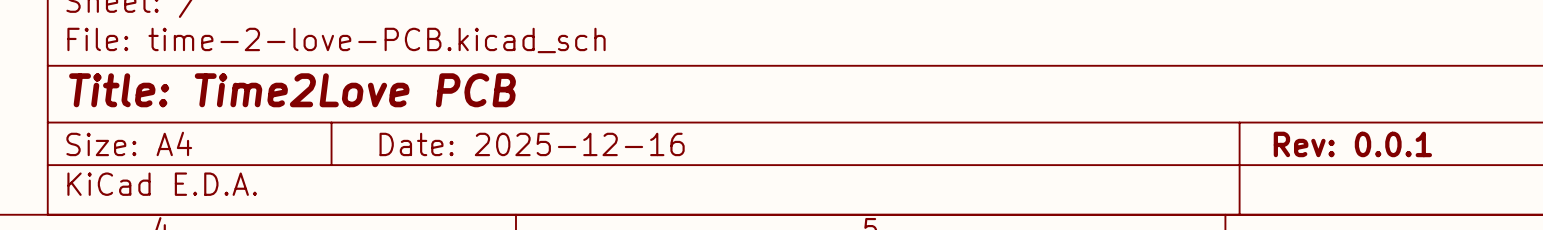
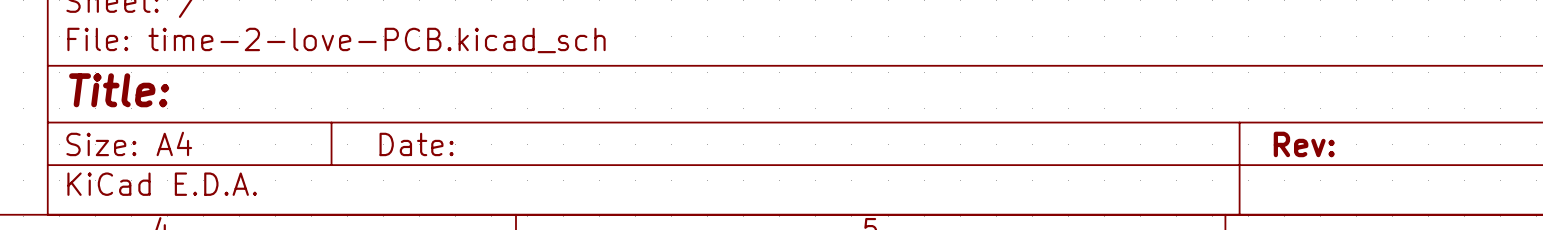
title block: Title: Time2Love PCB (292, 90) -> Title: (119, 90)
title block: Date: 2025-12-16 (532, 144) -> Date: (416, 144)
title block: Rev: 0.0.1 (1352, 144) -> Rev: (1304, 144)

